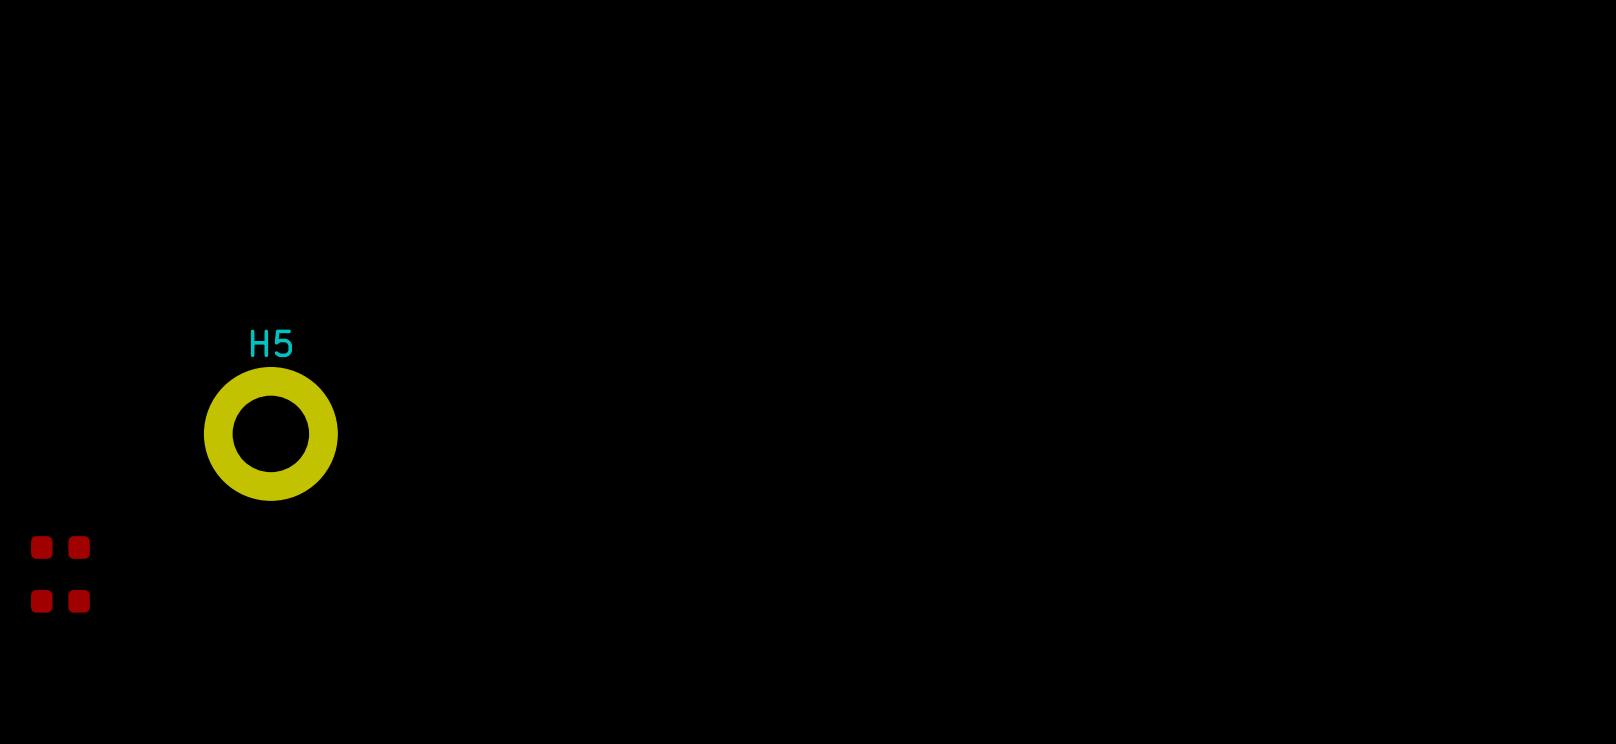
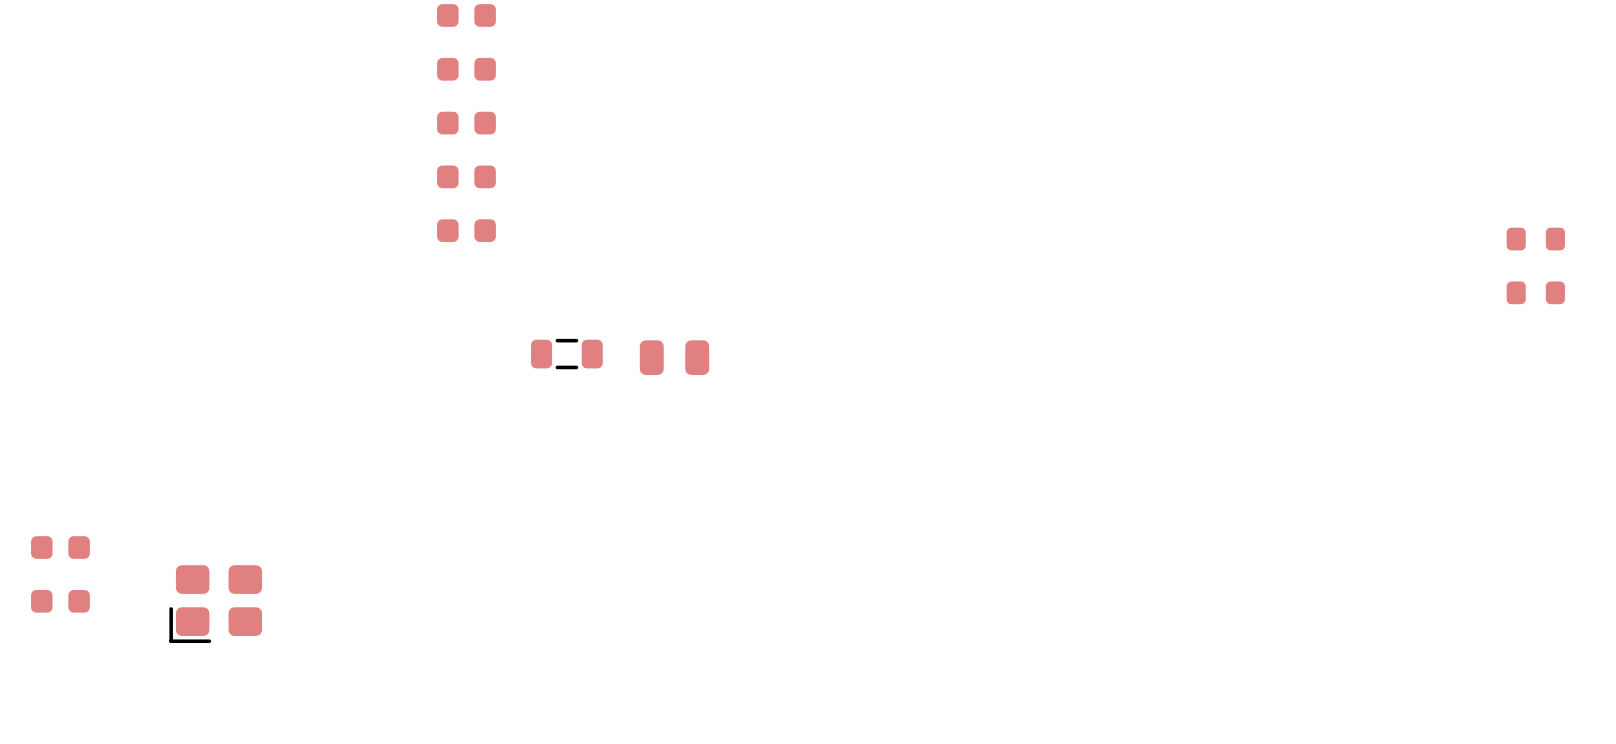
part: none -> (466, 15)
part: none -> (466, 69)
part: none -> (466, 123)
part: none -> (466, 176)
part: none -> (466, 230)
part: none -> (1535, 239)
part: none -> (1535, 292)
part: none -> (566, 354)
part: none -> (674, 357)
H5: (270, 433) -> none
part: none -> (215, 604)

